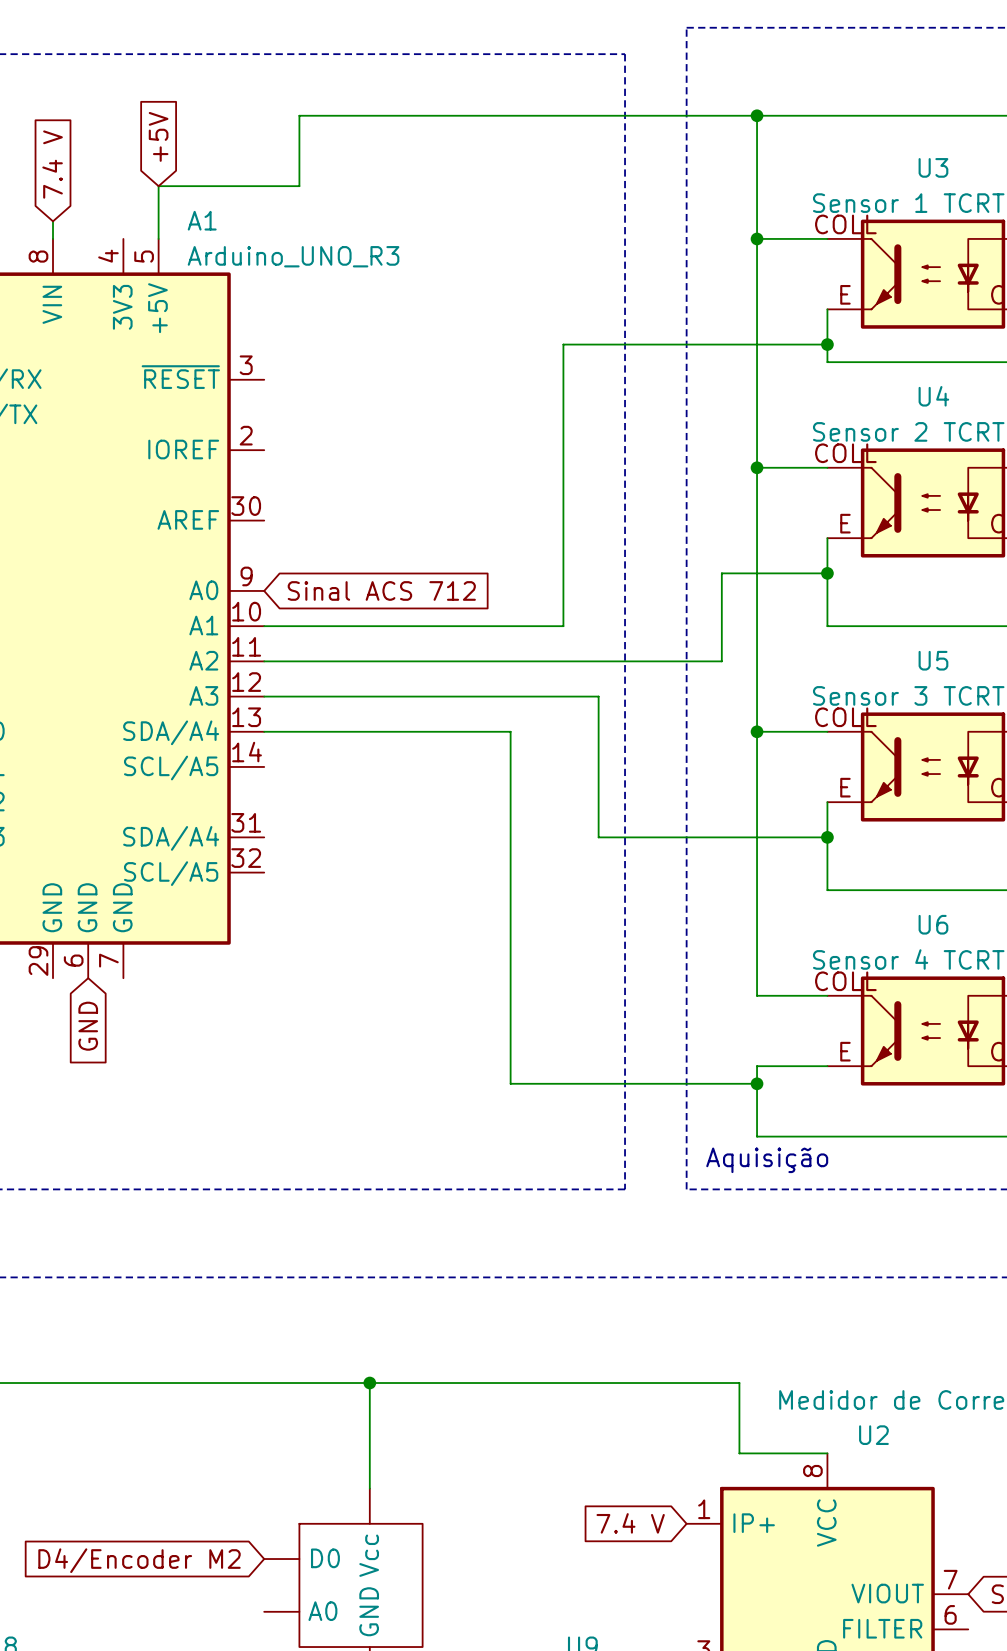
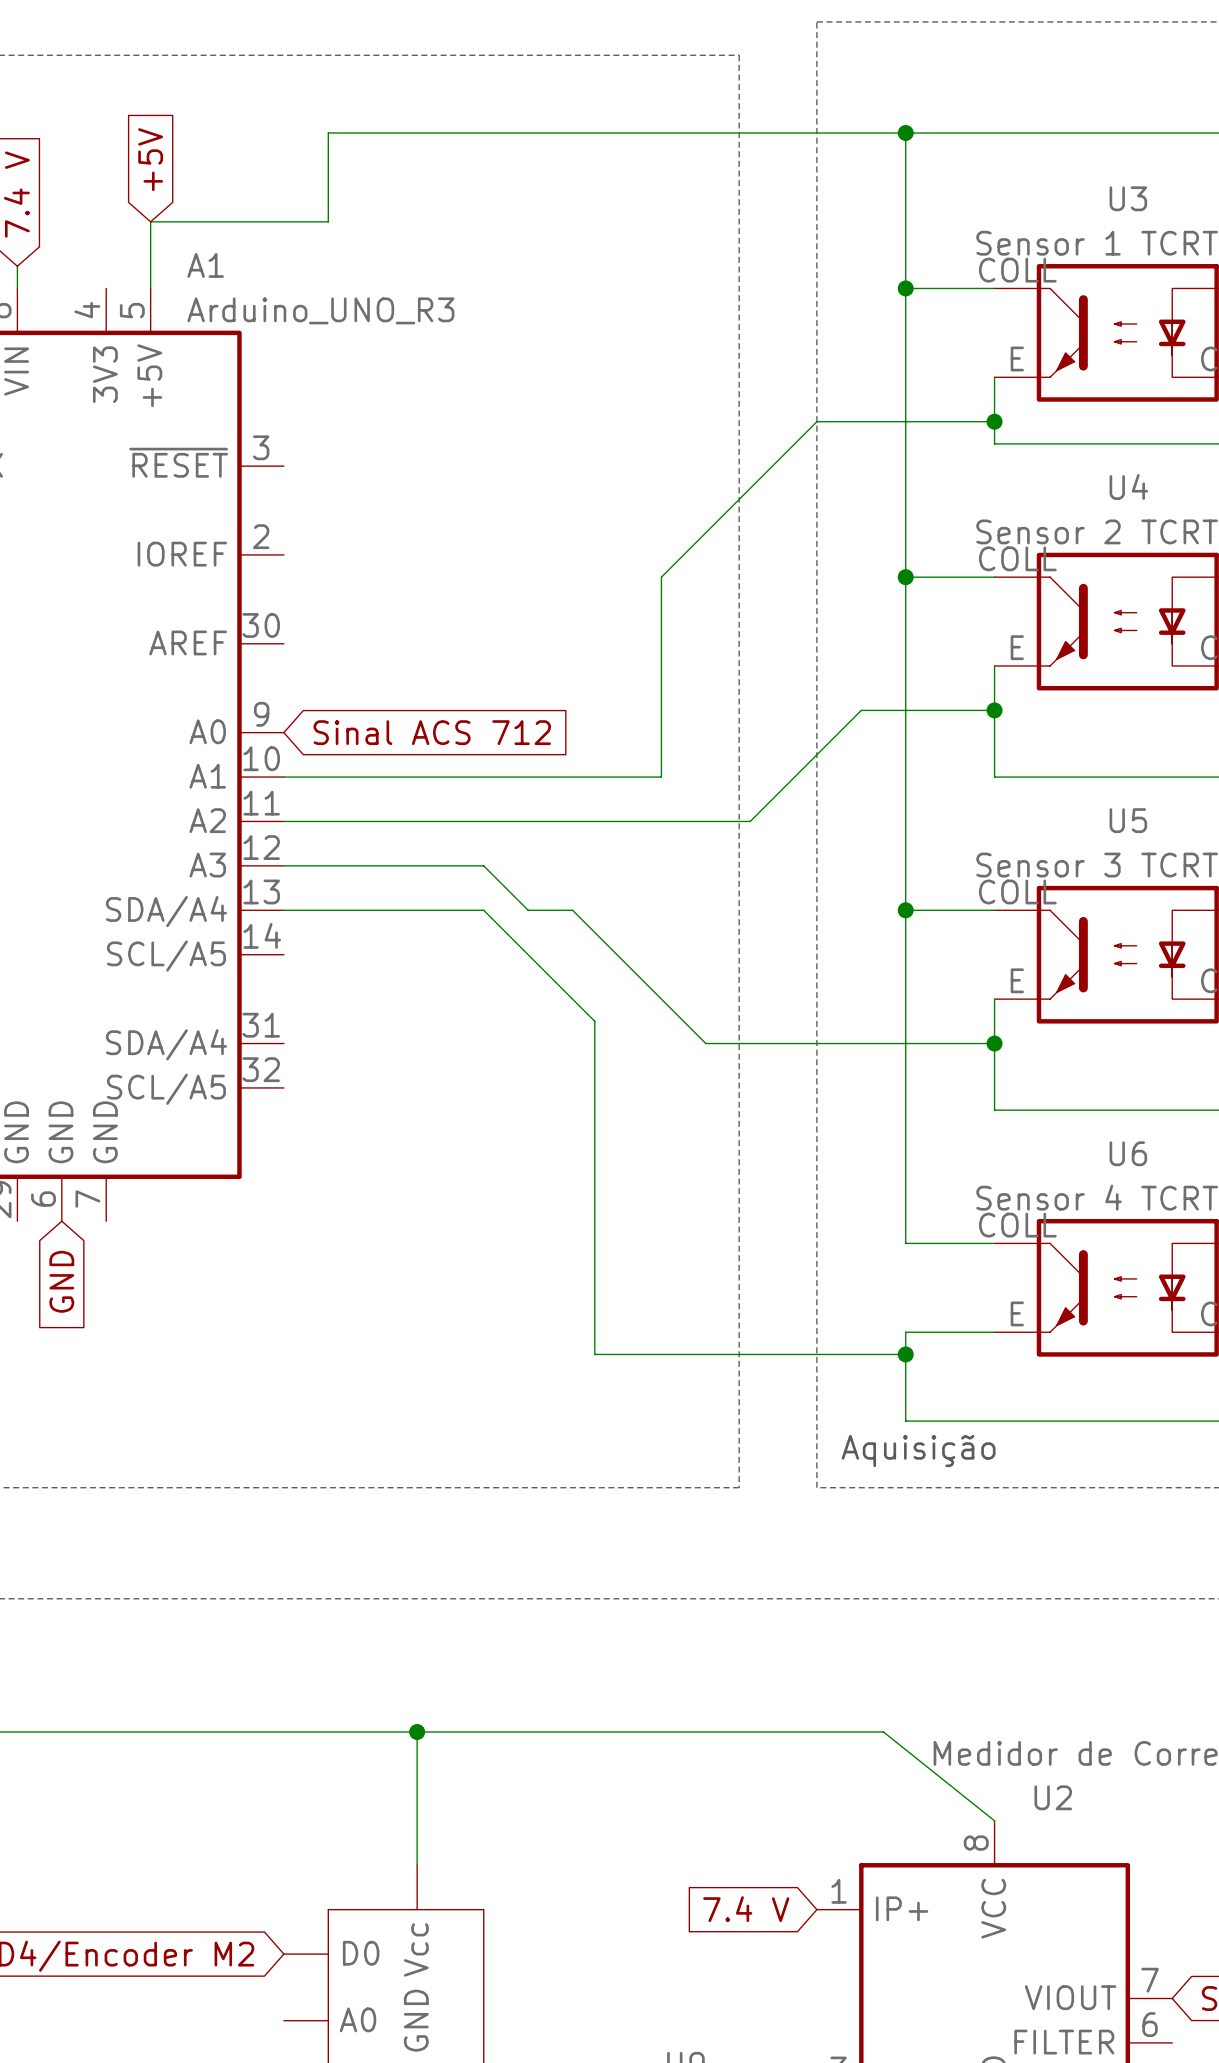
wire: (686, 344) (563, 344) (563, 467) -> (816, 421) (661, 577)
wire: (721, 573) (721, 661) (633, 661) -> (861, 710) (750, 821)
wire: (422, 696) (598, 696) (598, 837) -> (572, 910) (705, 1043)
wire: (422, 731) (457, 731) -> (483, 865) (528, 910)
wire: (493, 731) (510, 731) (510, 819) -> (483, 910) (594, 1021)
wire: (739, 1383) (739, 1453) (827, 1453) -> (883, 1732) (994, 1820)

